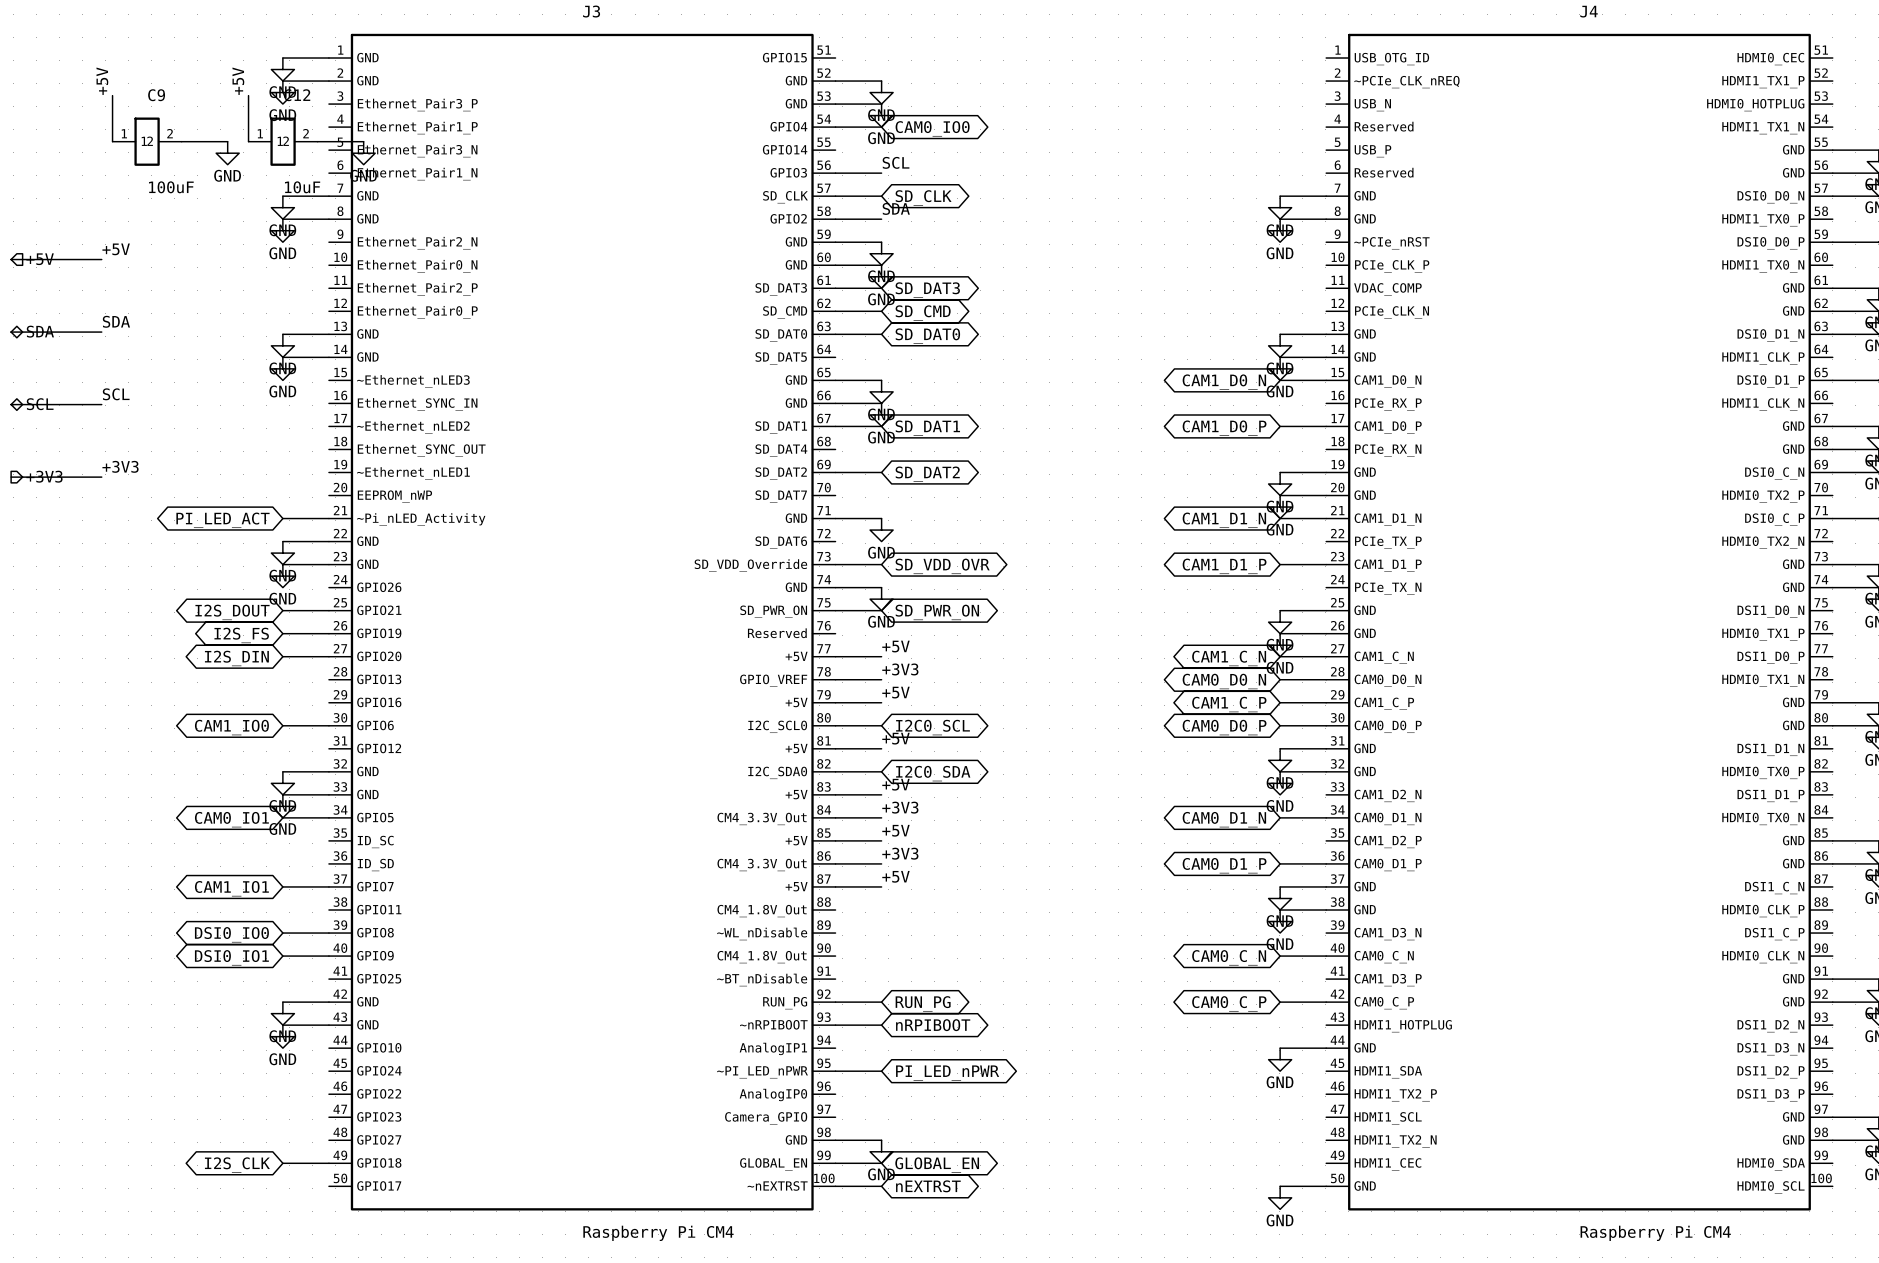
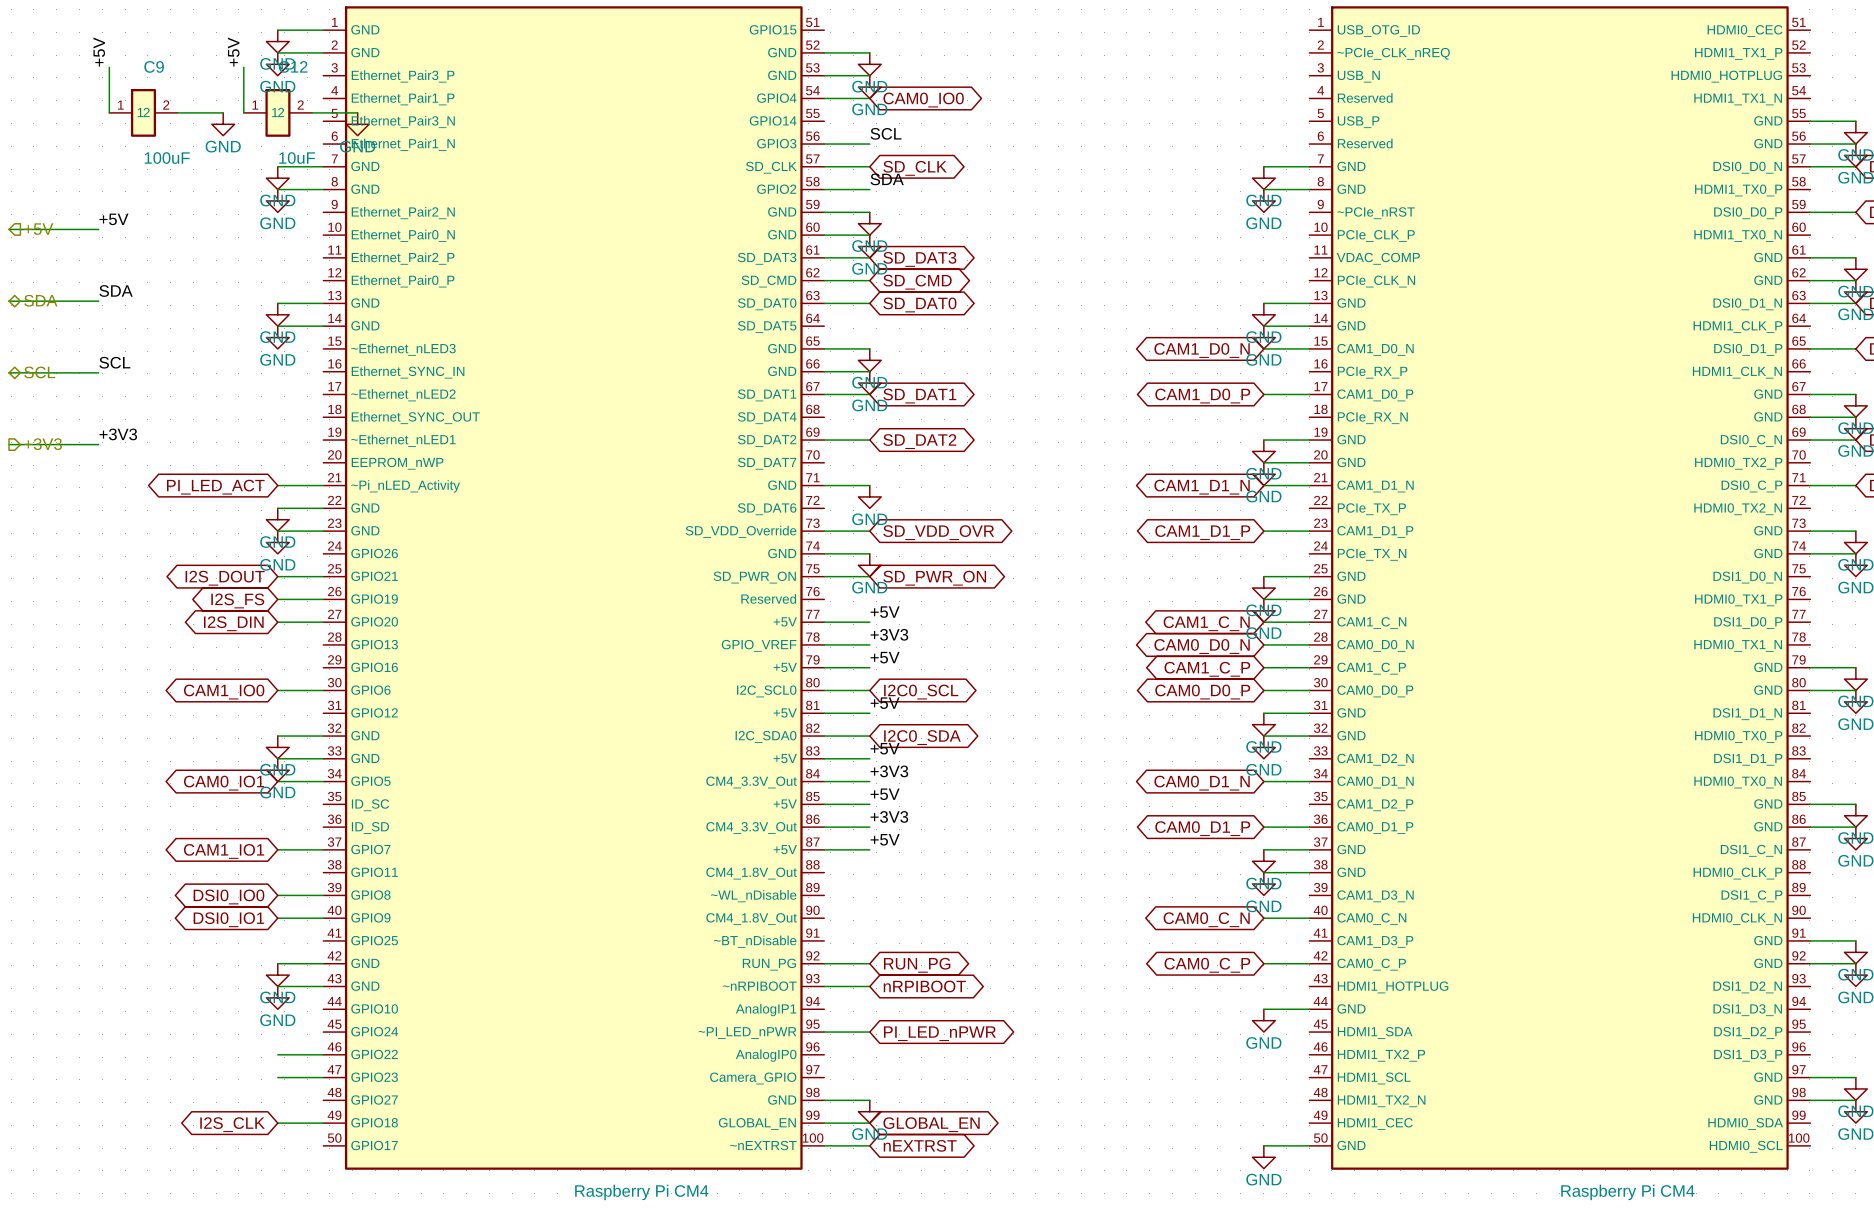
wire: none -> (277, 1054) (323, 1054)
wire: none -> (277, 1077) (323, 1077)

